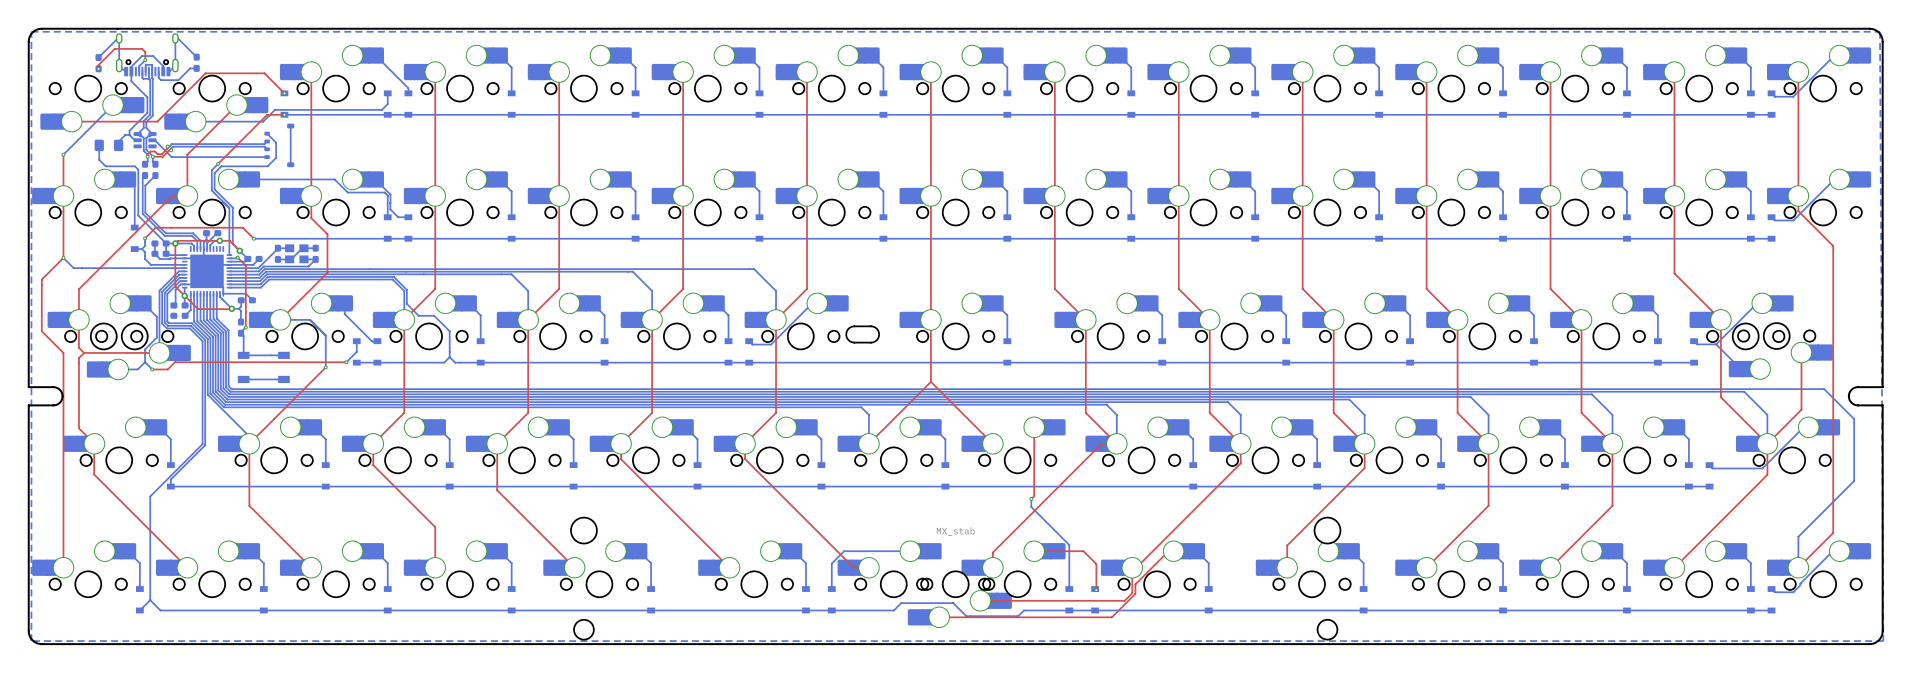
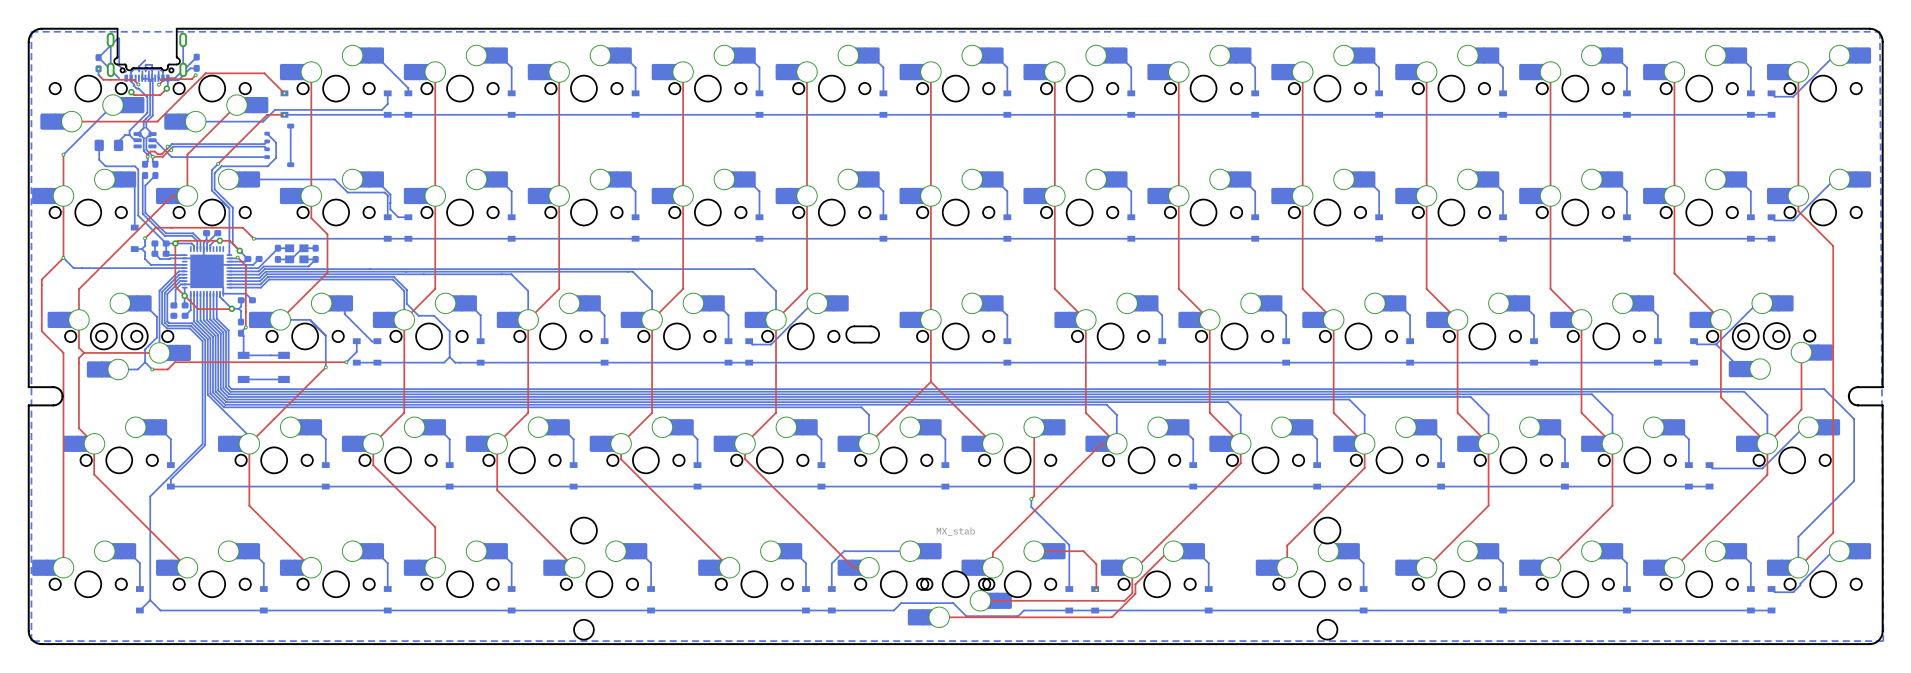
drawing shape: [27, 27, 1884, 646] -> [27, 27, 1884, 646]
part footprint: [115, 33, 179, 77] -> [106, 32, 188, 82]
bottom track: none -> (110, 39) (110, 69)
bottom track: none -> (183, 39) (183, 69)
bottom track: none -> (98, 57) (119, 78)
bottom track: (196, 57) (177, 38) (175, 38) (175, 65) (168, 71) -> (196, 57) (183, 69)
top track: (145, 60) (145, 52) (142, 48) (114, 48) (98, 65) (98, 68) -> none
via: (145, 60) -> none
bottom track: none -> (98, 68) (100, 76)
bottom track: none -> (183, 69) (174, 78) (167, 78) (166, 88)
bottom track: (163, 71) (163, 66) (153, 56) (142, 56) (131, 66) (131, 81) (138, 88) -> (162, 78) (162, 72) (160, 69) (133, 69) (131, 72) (131, 81) (138, 88)
top track: none -> (195, 75) (191, 79) (164, 79) (159, 84)
via: none -> (195, 75)
top track: none -> (100, 76) (103, 79) (133, 79) (138, 84)
via: none -> (138, 84)
via: none -> (159, 84)
top track: none -> (166, 88) (160, 95) (134, 95) (131, 92)
via: none -> (166, 88)
via: none -> (131, 92)

